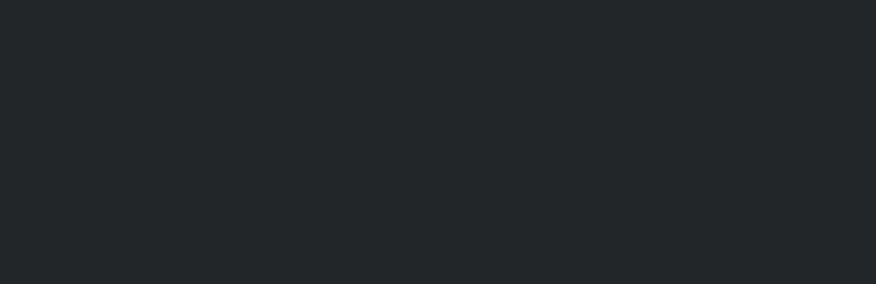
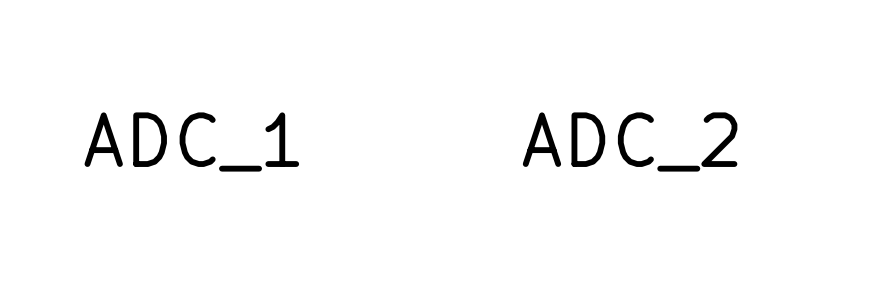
label: none -> ADC_1 (191, 142)
label: none -> ADC_2 (630, 142)

